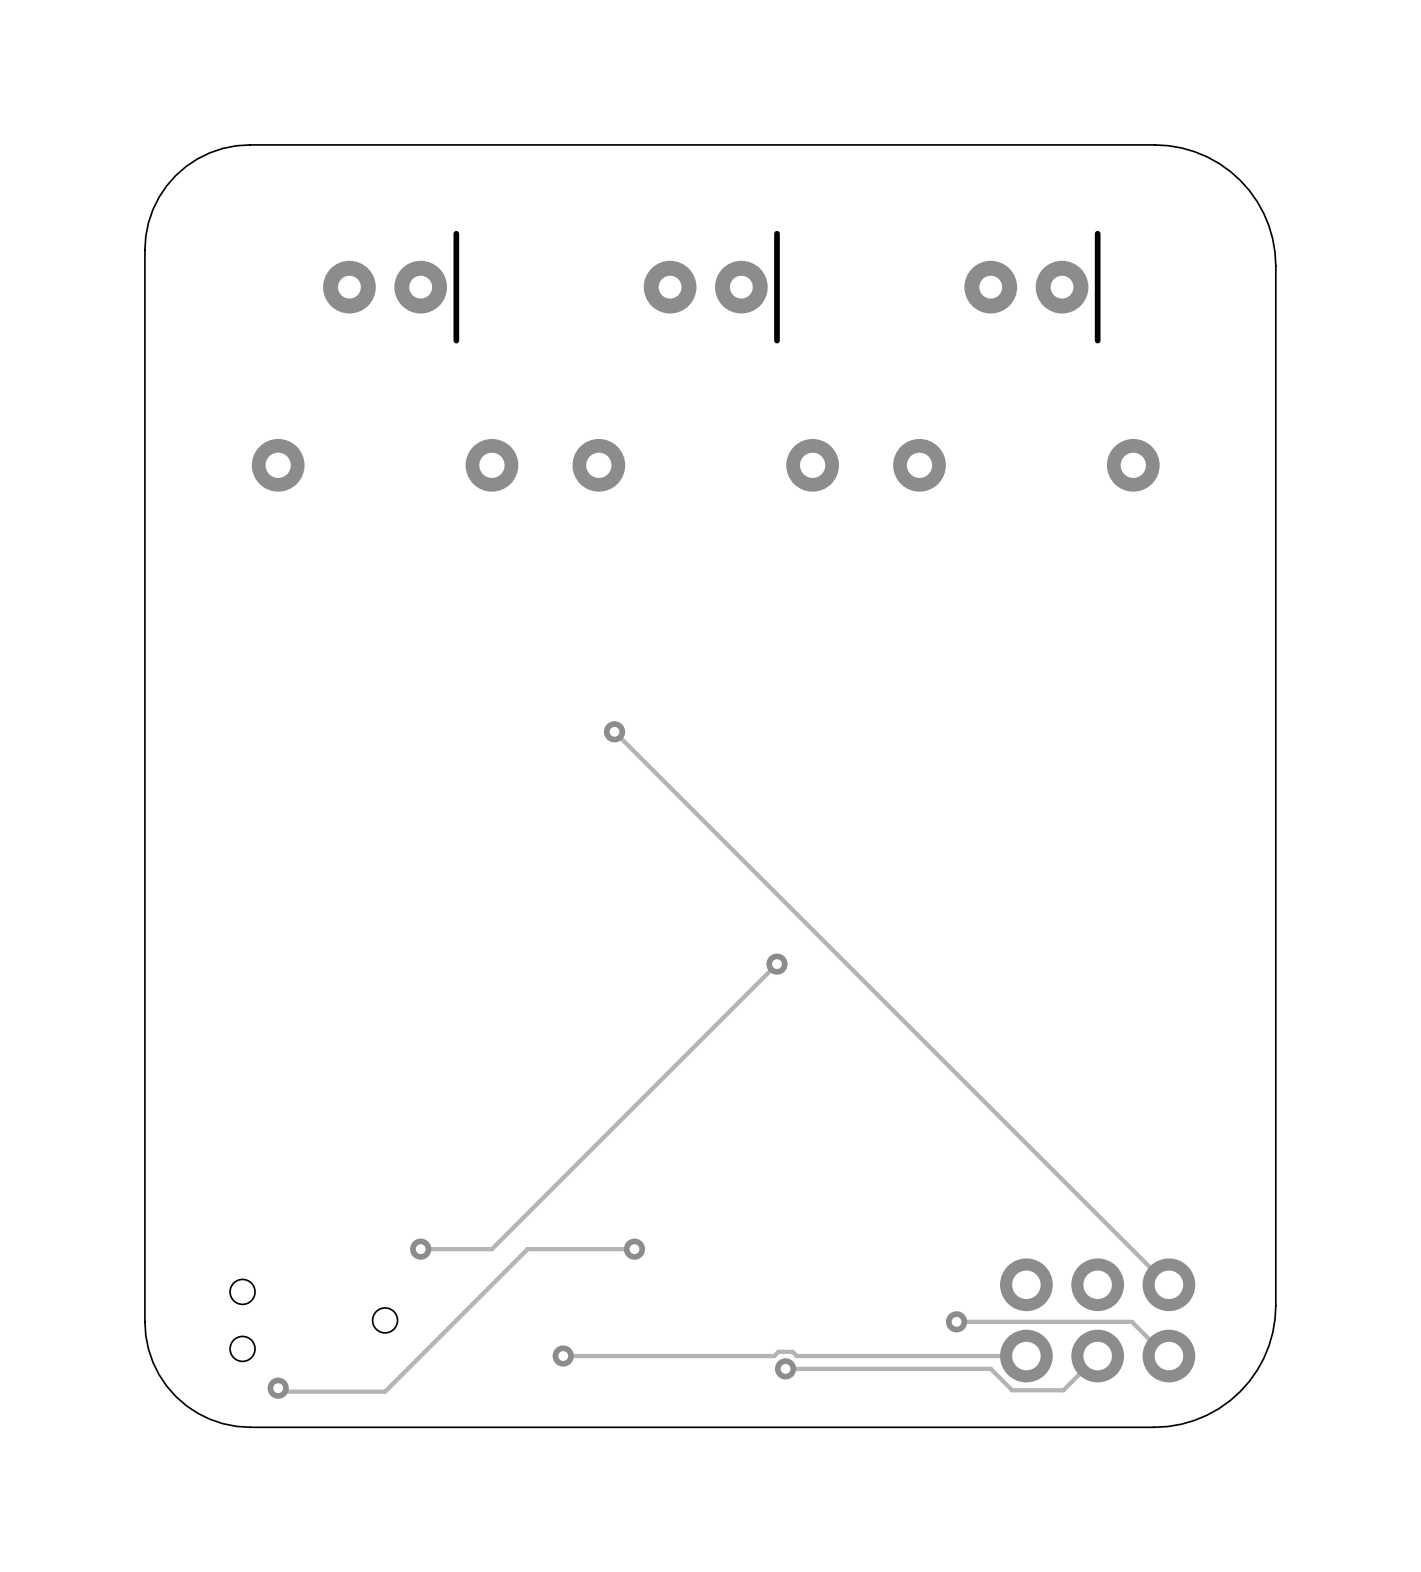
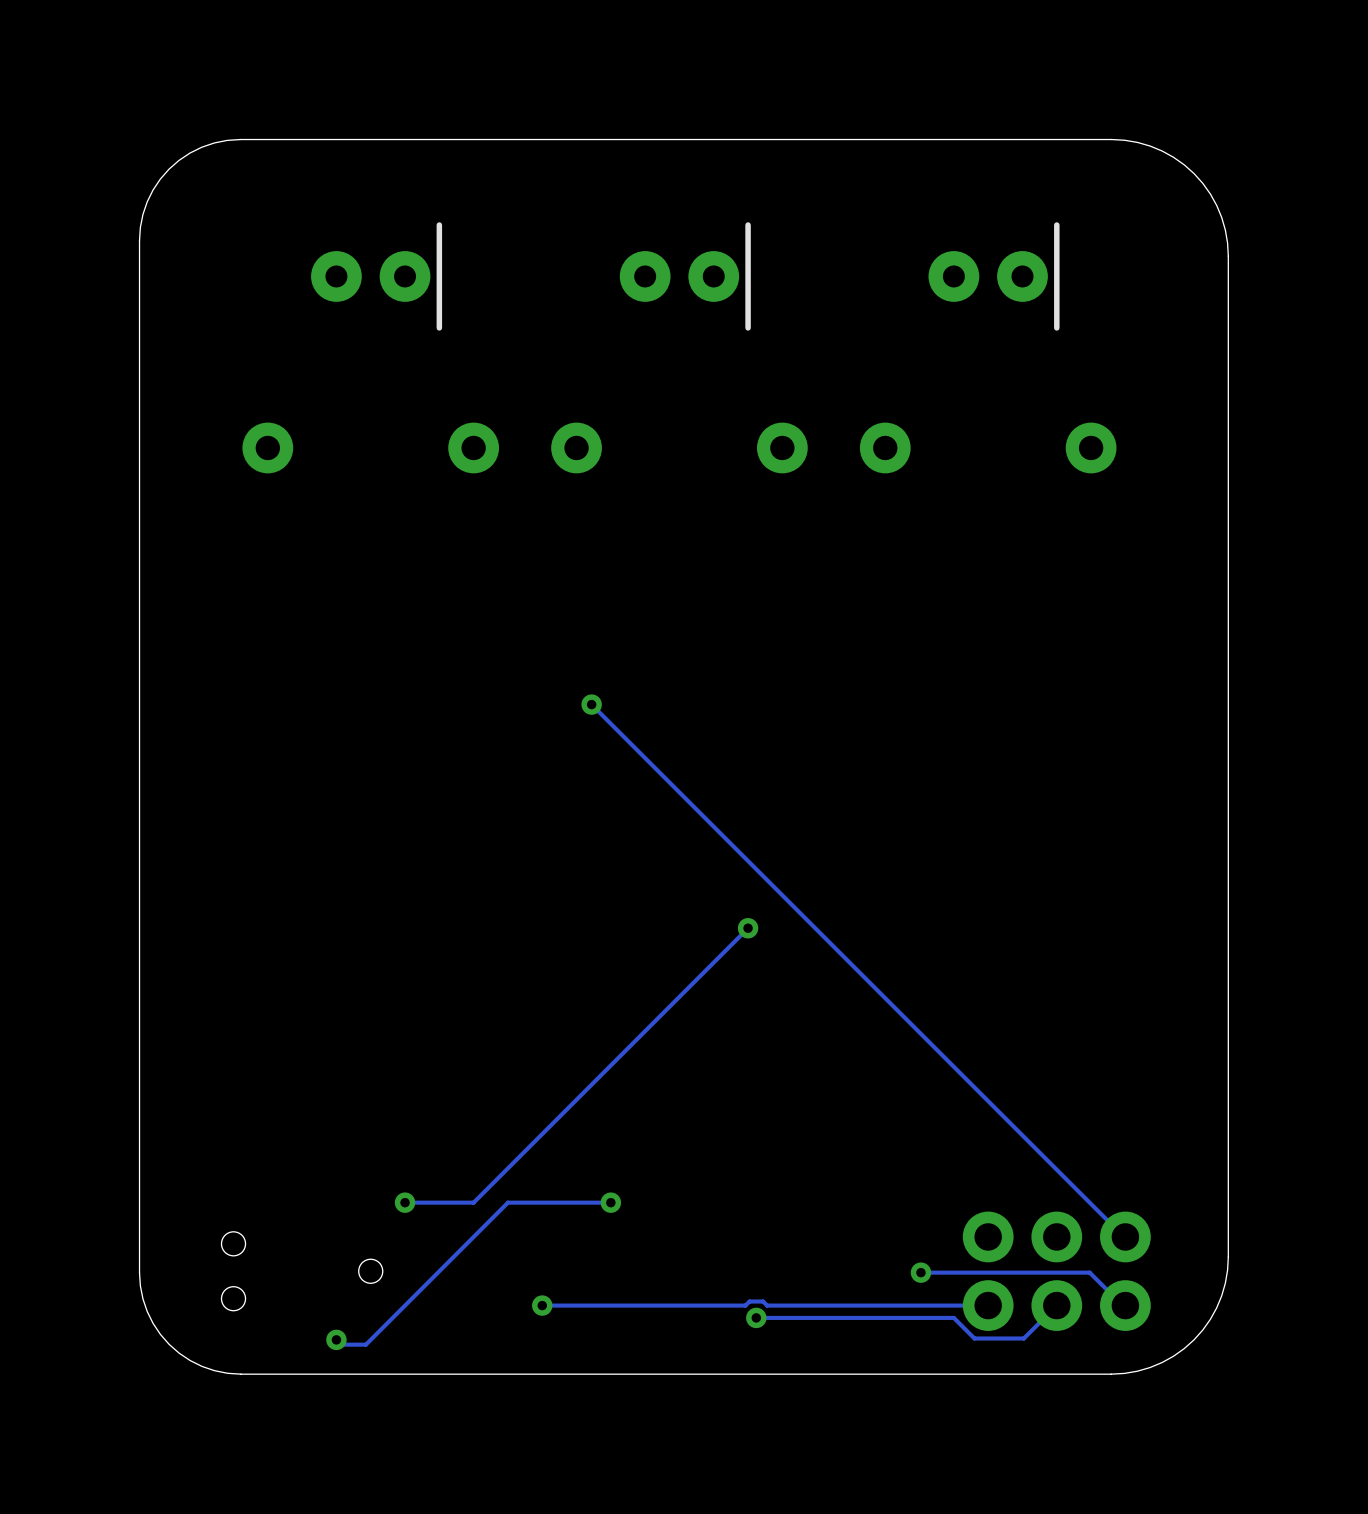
track: (278, 1388) (281, 1391) (385, 1391) -> (336, 1344) (365, 1344) (370, 1339)
via position: (278, 1388) -> (336, 1339)

